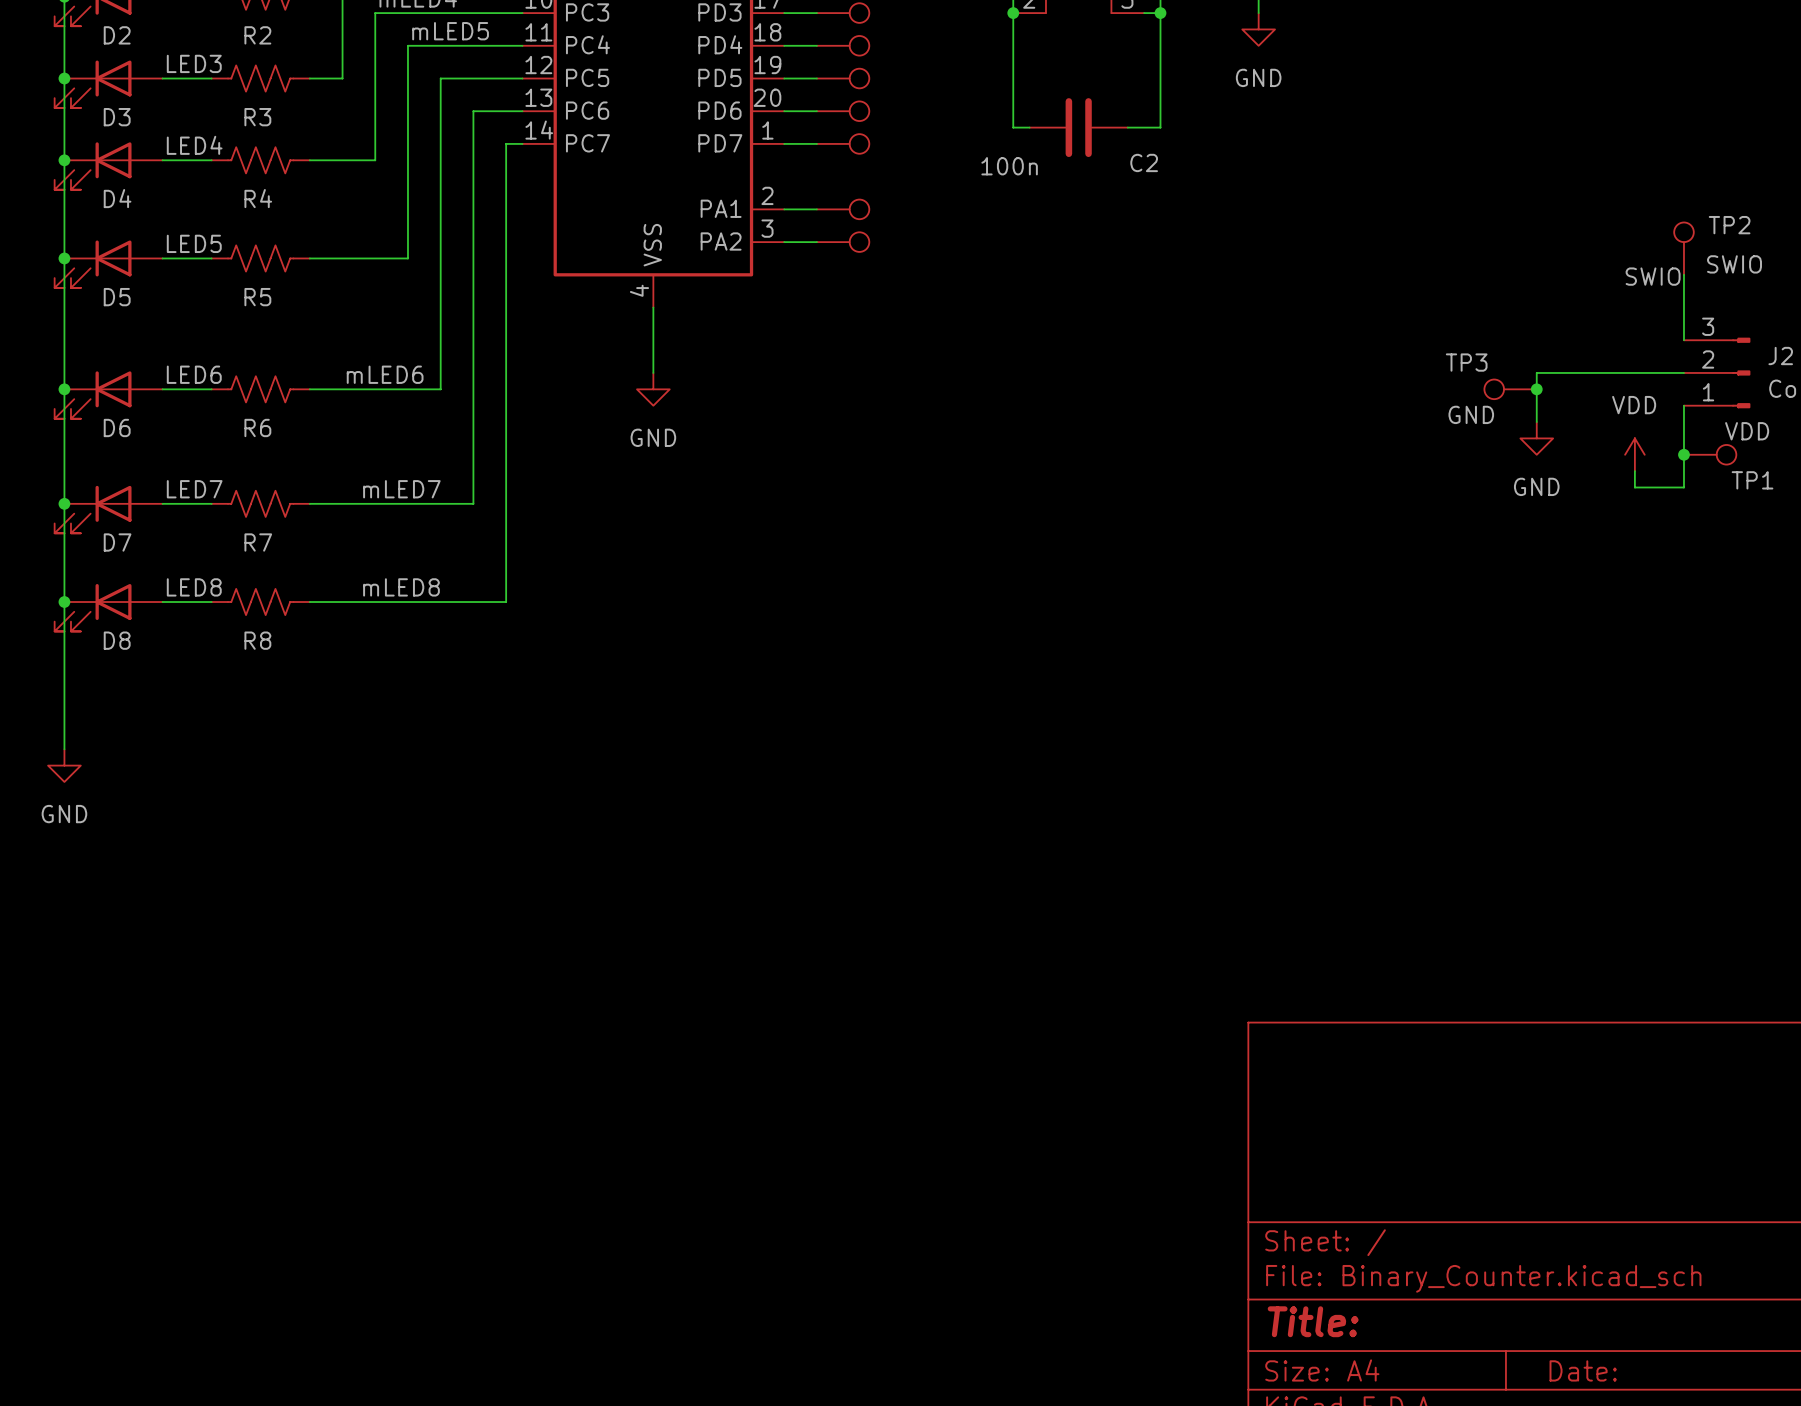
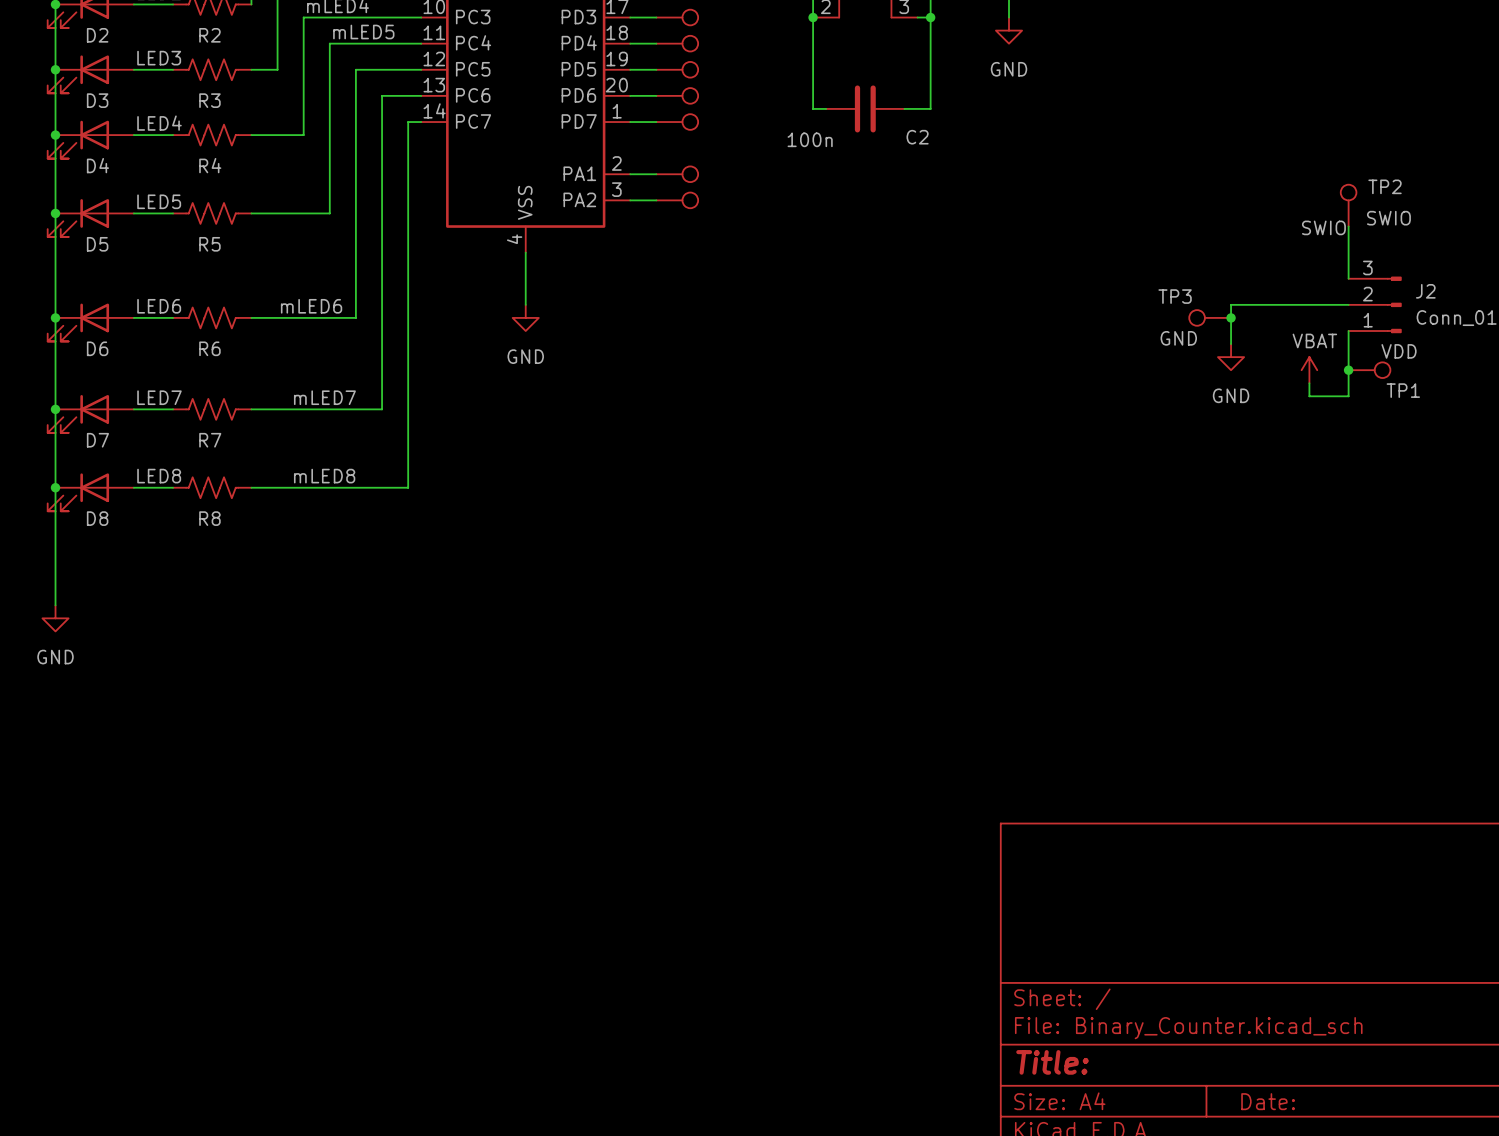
power symbol: VDD (1634, 454) -> VBAT (1309, 370)

